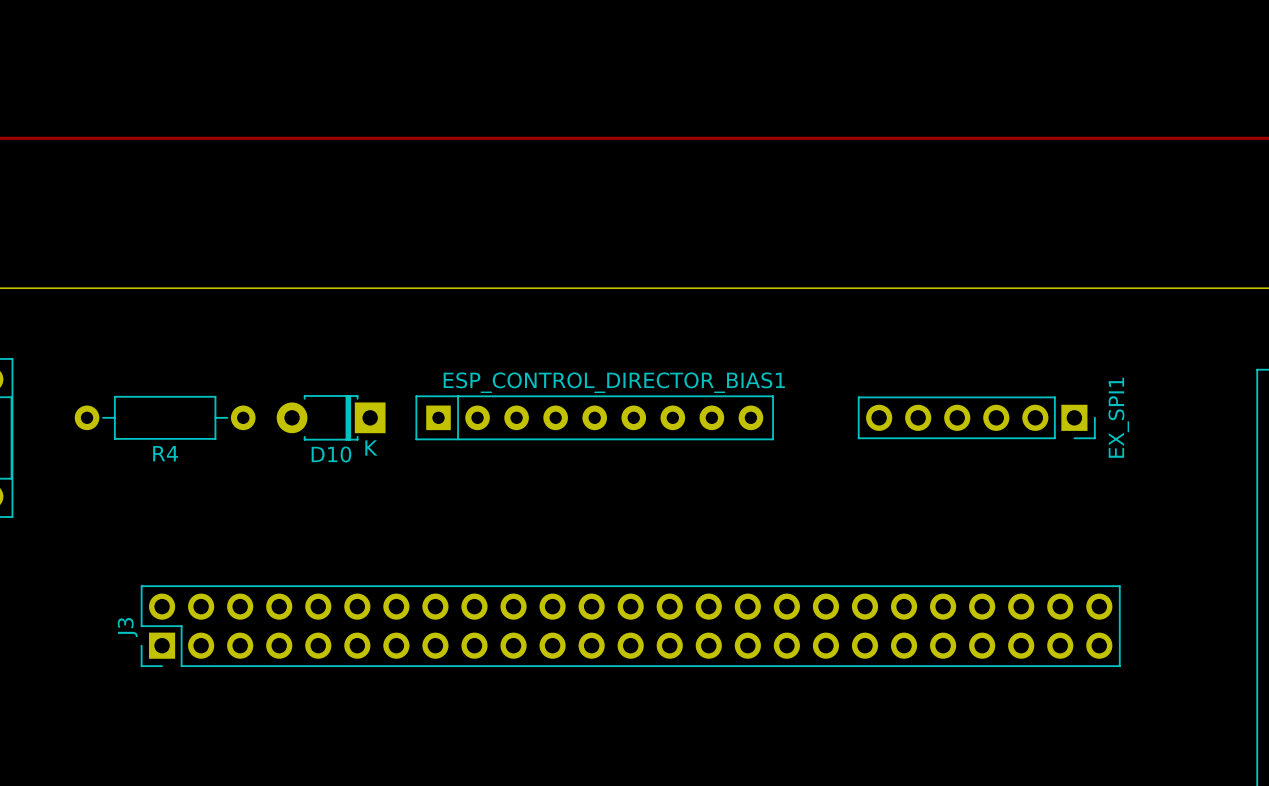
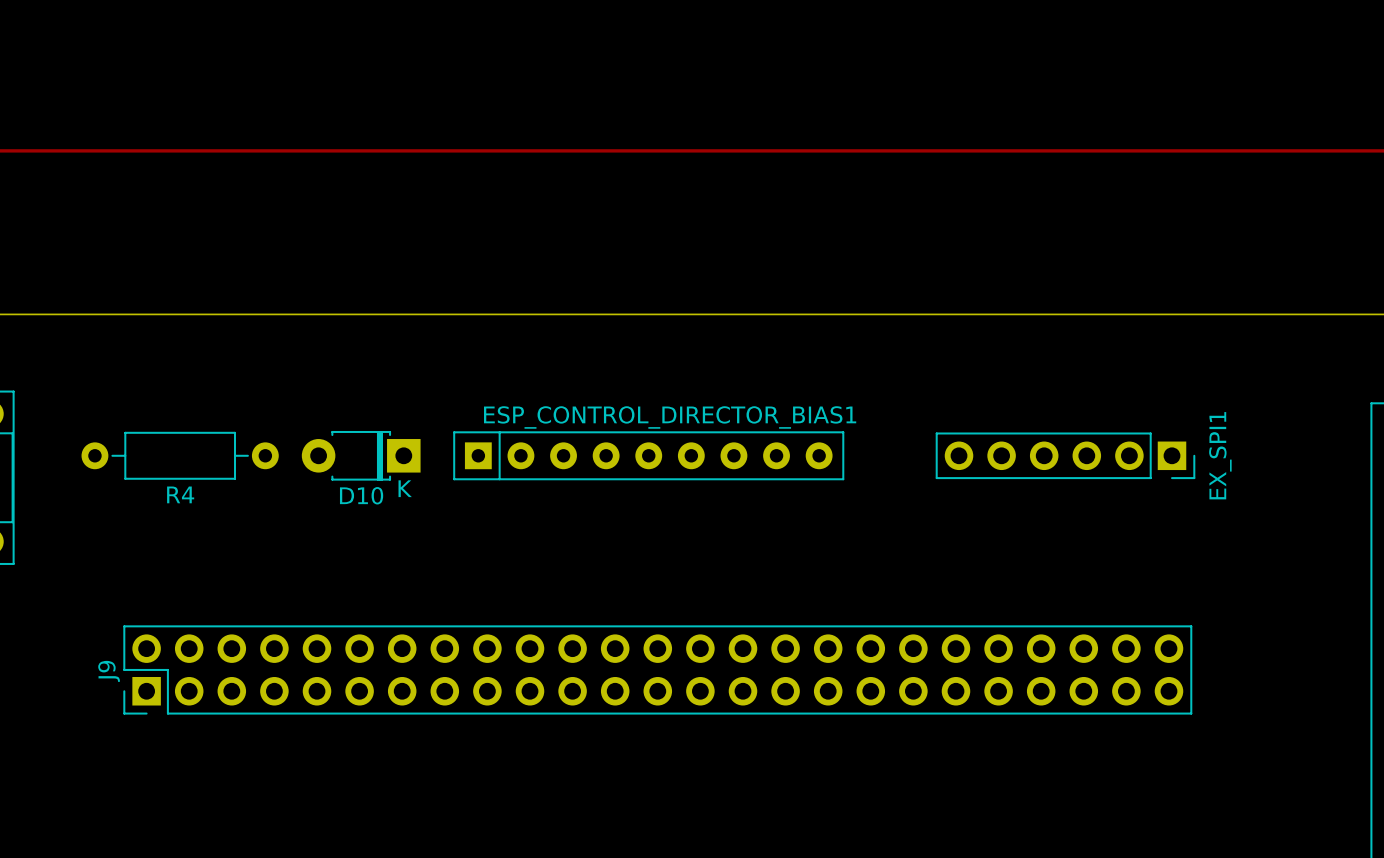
J9: none -> (657, 669)
J3: (630, 626) -> none

